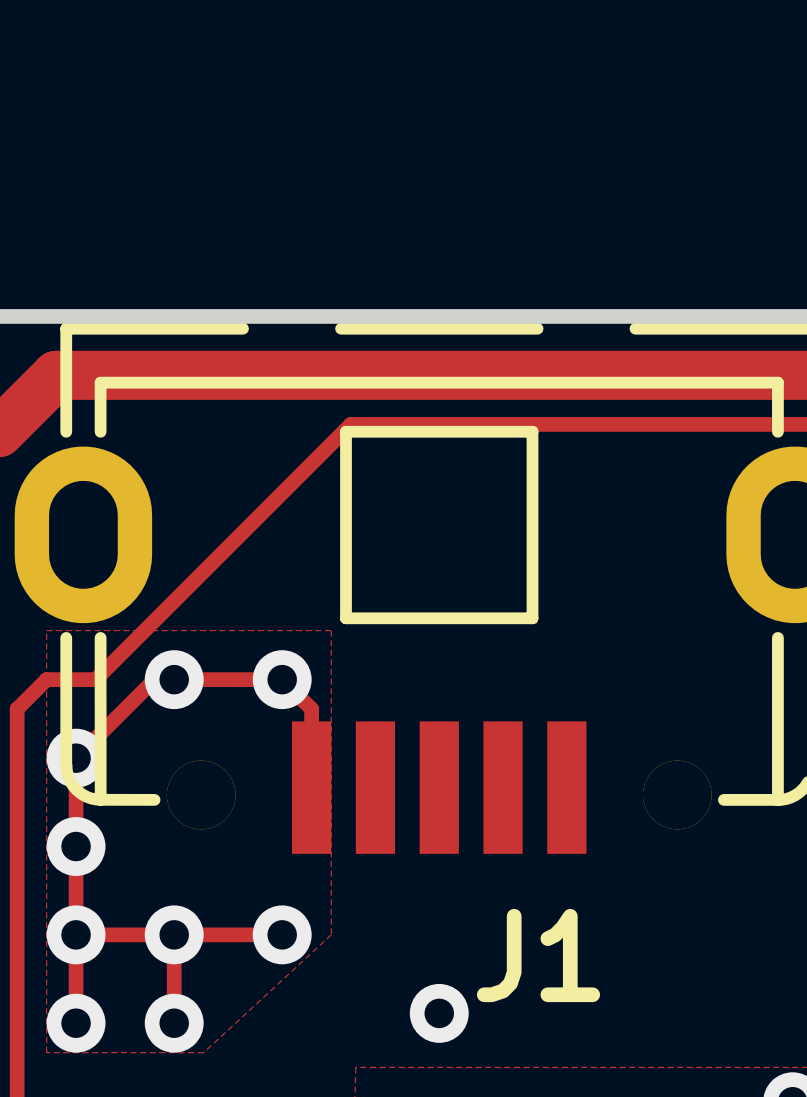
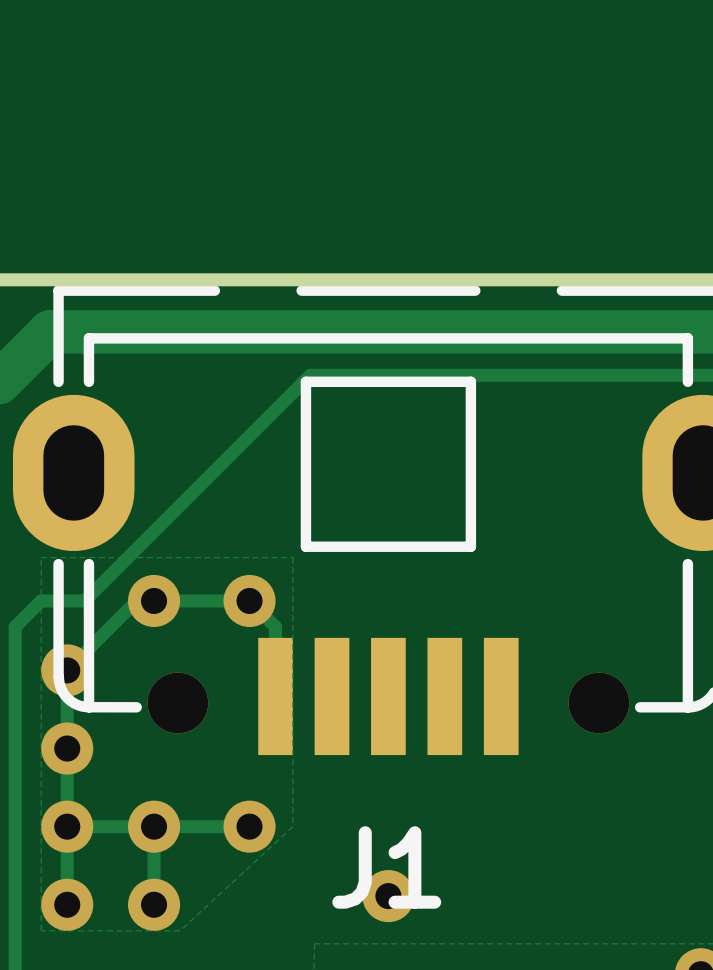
J1 name position: J1 (538, 955) -> J1 (386, 867)

